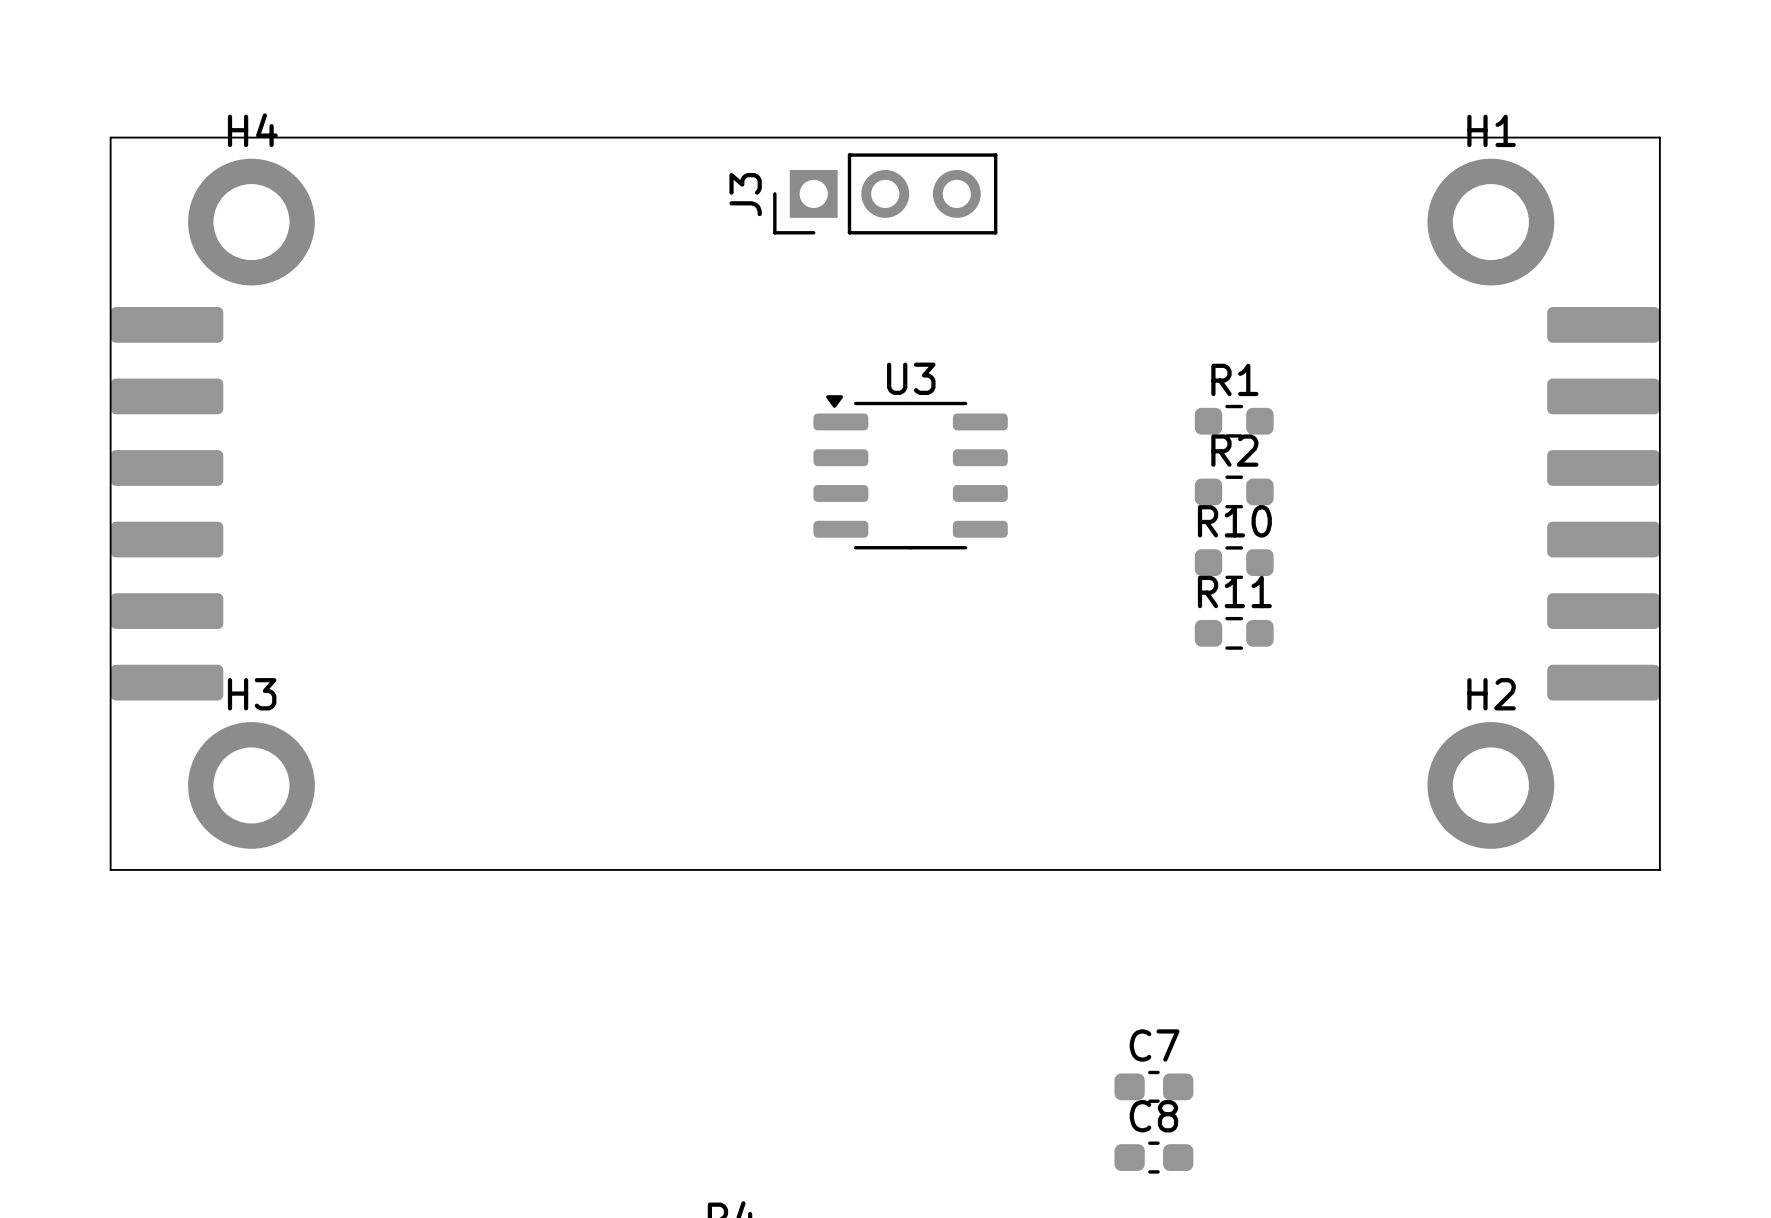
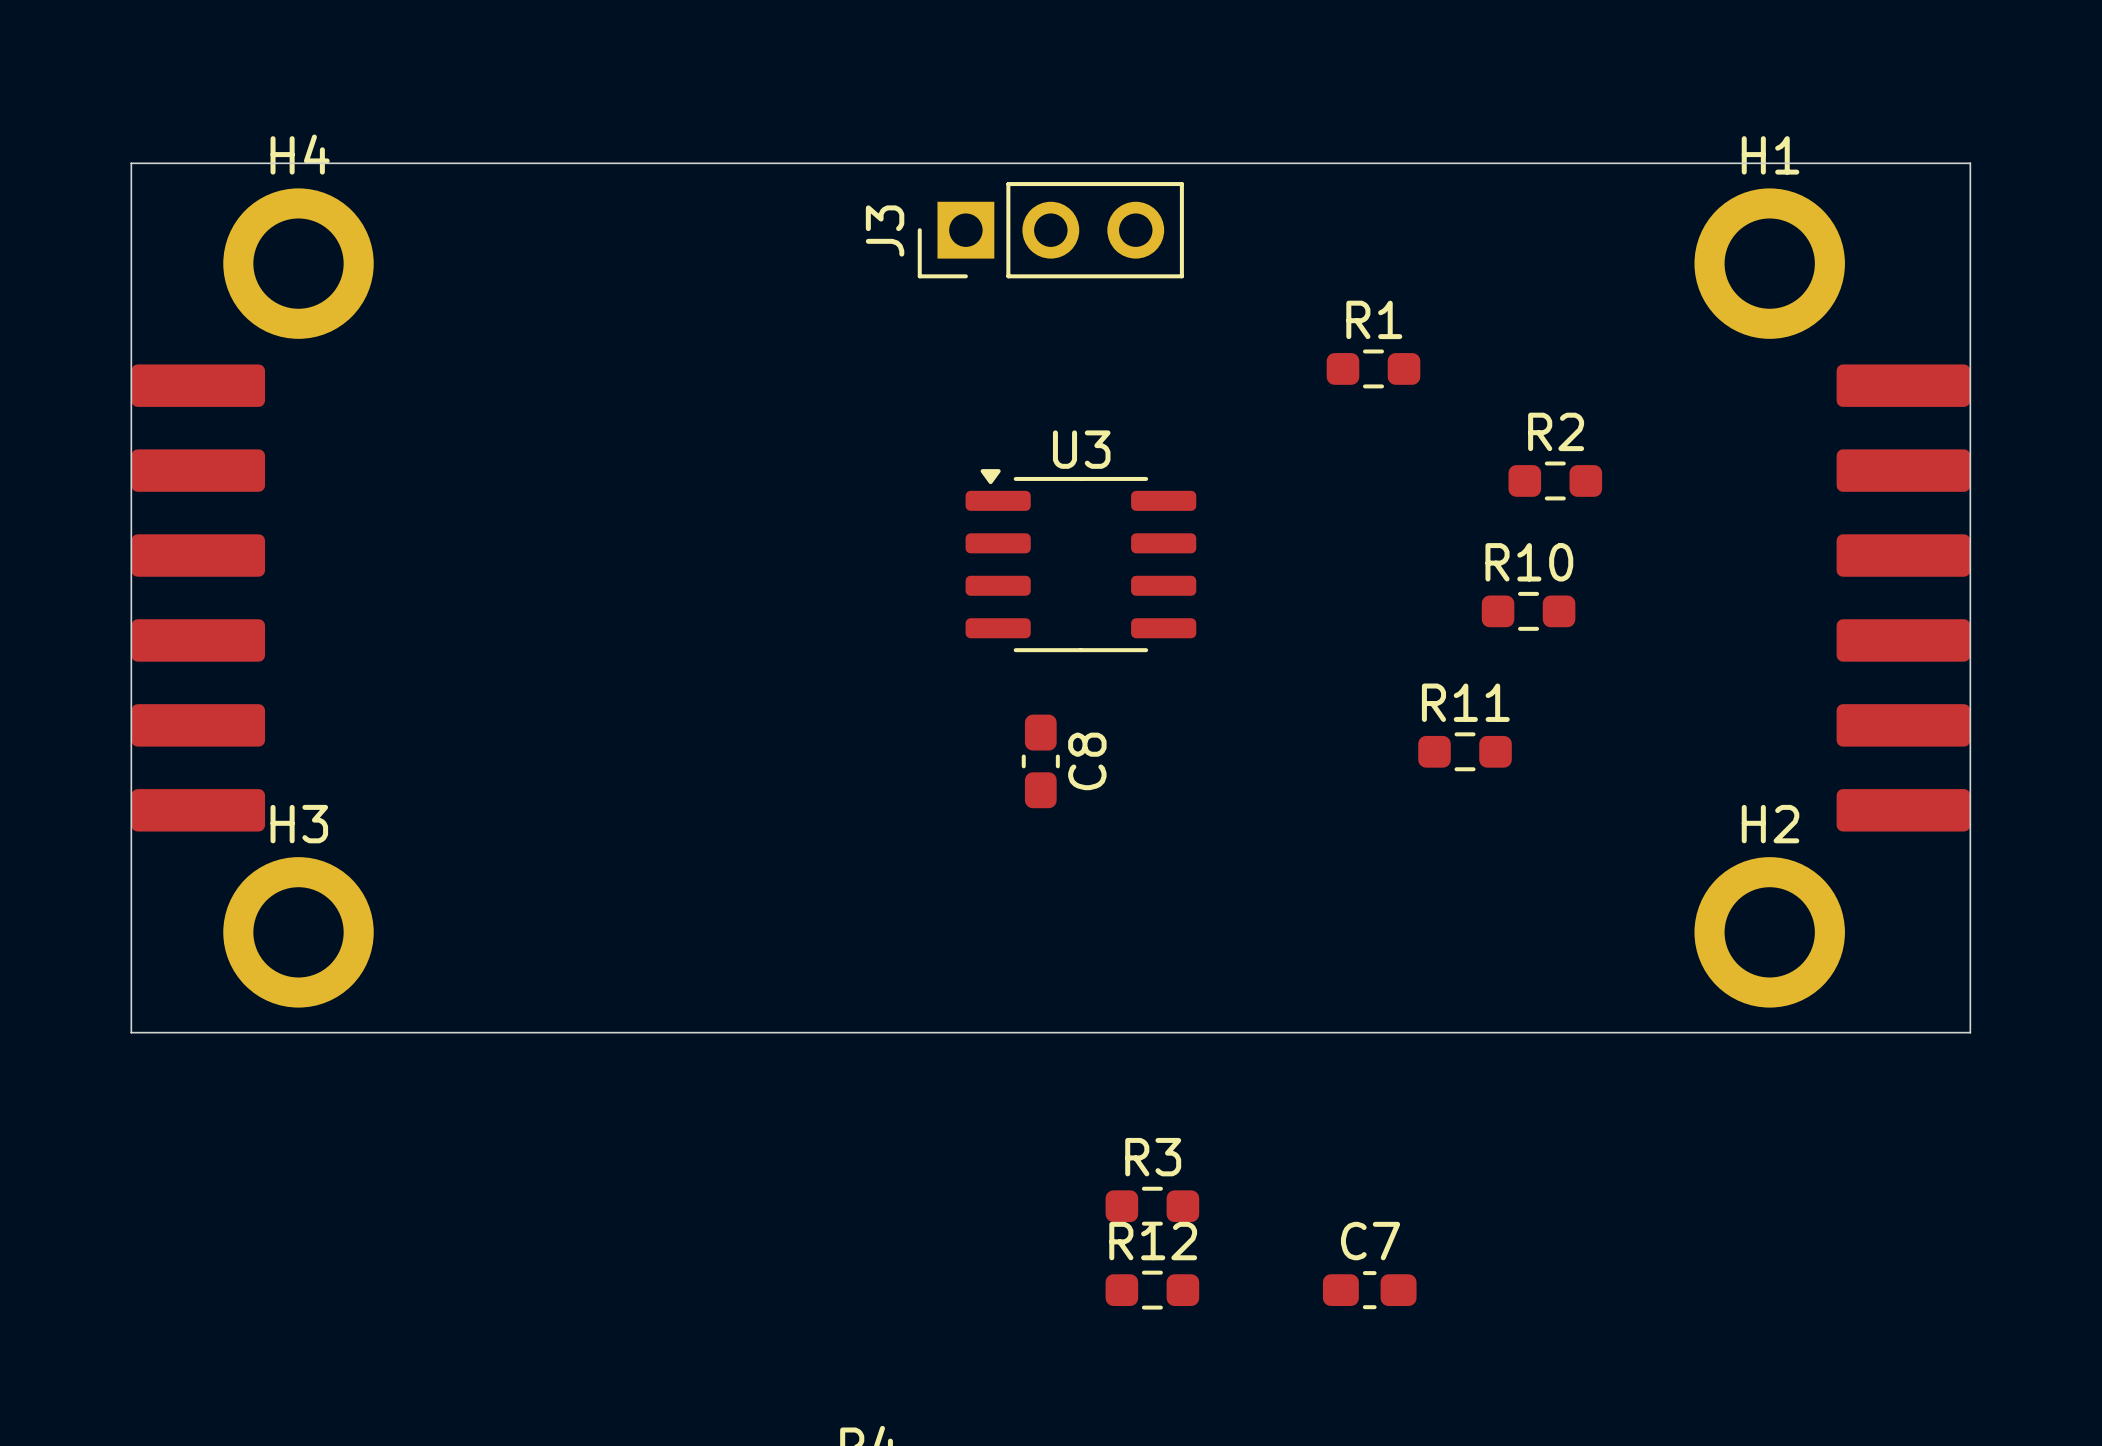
R1 position: (1234, 421) -> (1373, 368)
R2 position: (1234, 491) -> (1555, 480)
R10 position: (1234, 562) -> (1528, 611)
R3: none -> (1152, 1206)
R12: none -> (1152, 1290)
C8 rotation: 0° (1153, 1157) -> 90° clockwise (1040, 761)
C8 position: (1153, 1157) -> (1040, 761)

